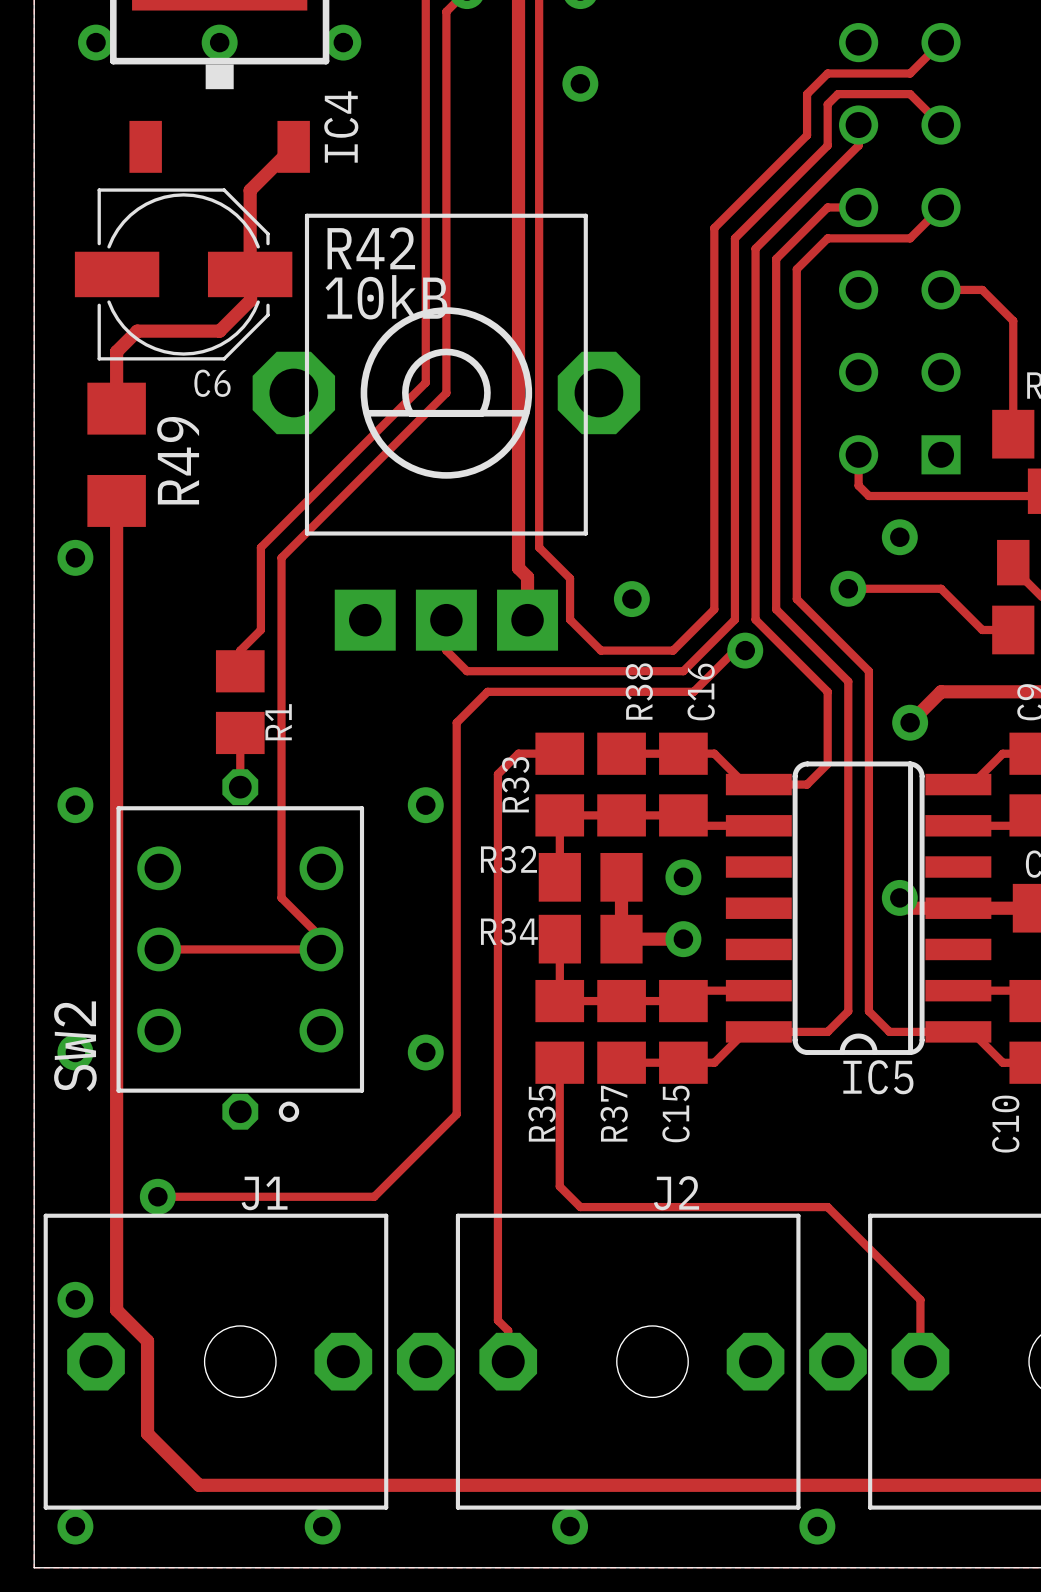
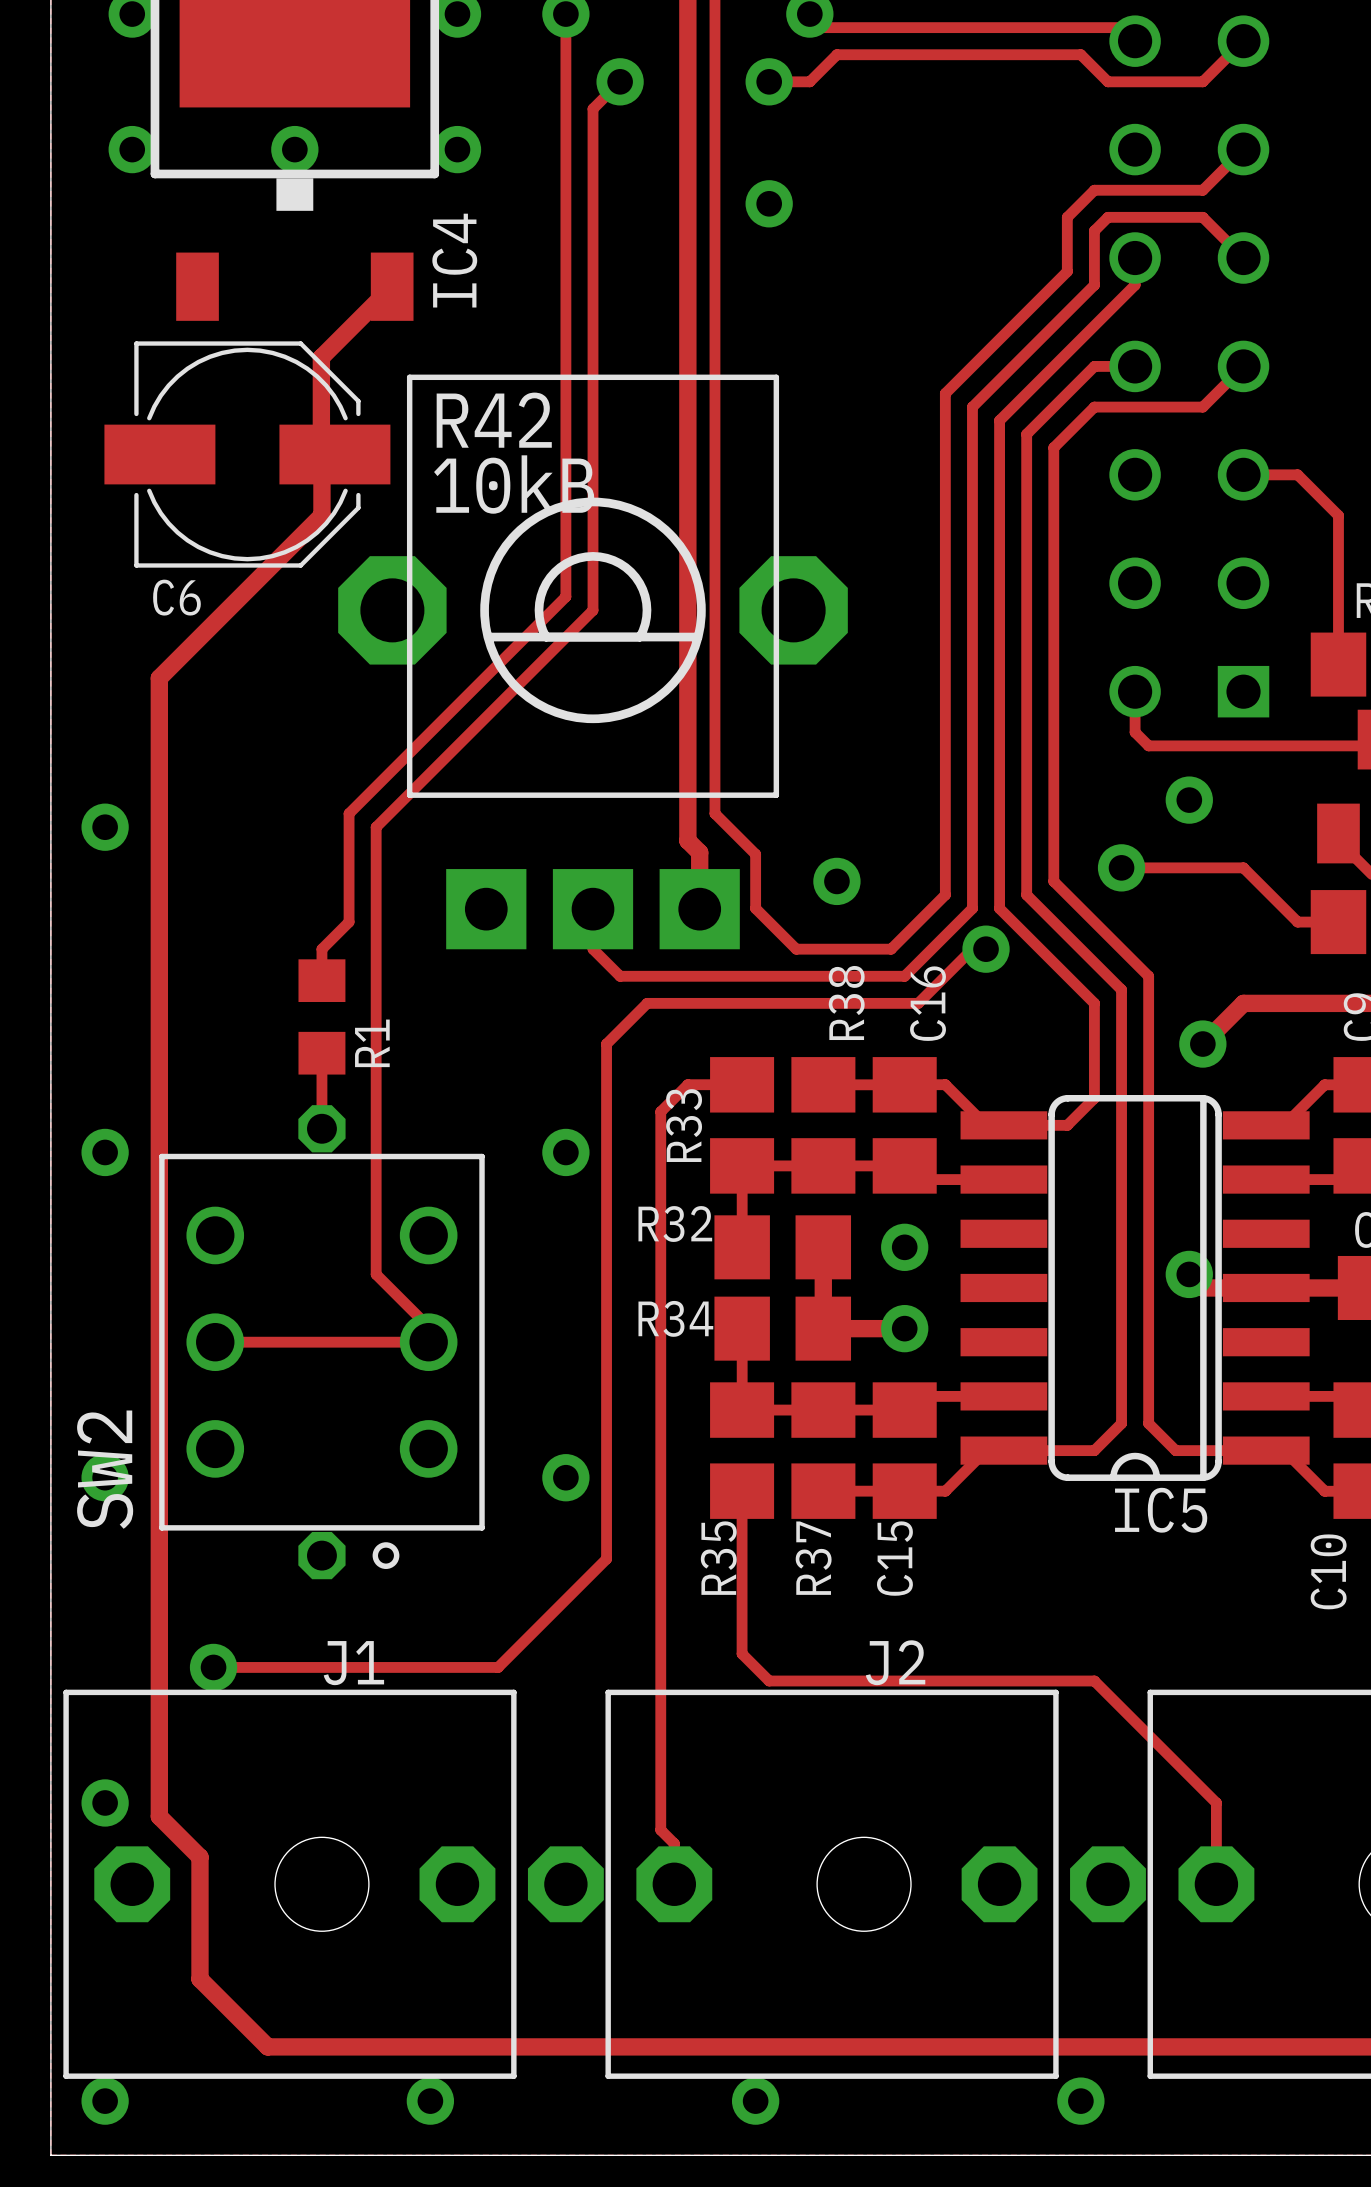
track: (250, 190) (250, 274) -> (334, 343) (321, 357) (321, 440) (334, 454) (321, 467) (321, 515) (159, 678) (159, 752)
track: (250, 274) (250, 300) (219, 331) (137, 331) (116, 351) (116, 408) -> none
C6 name position: C6 (212, 383) -> C6 (176, 597)
R49: (116, 454) -> none
R1 footprint: [215, 650, 265, 755] -> [298, 959, 346, 1075]

